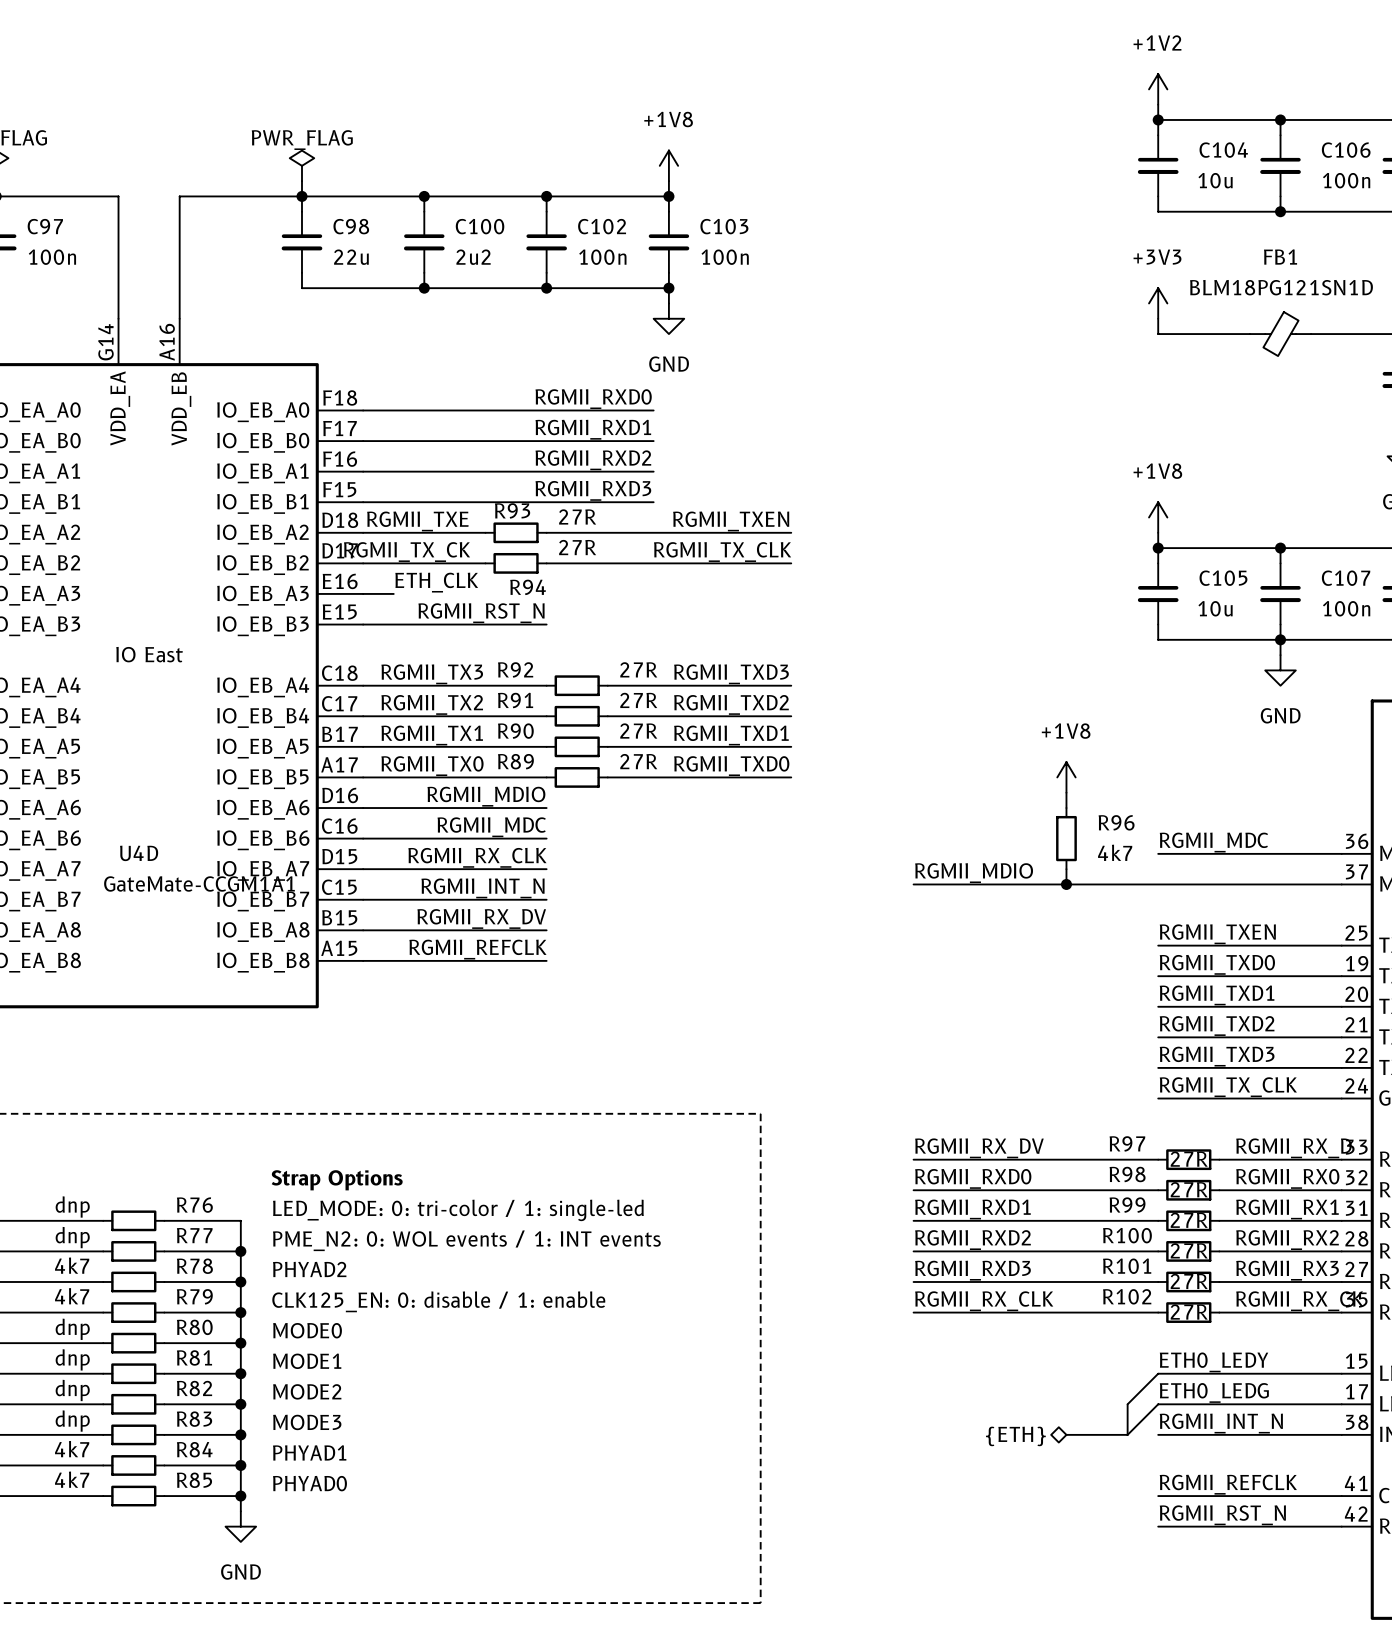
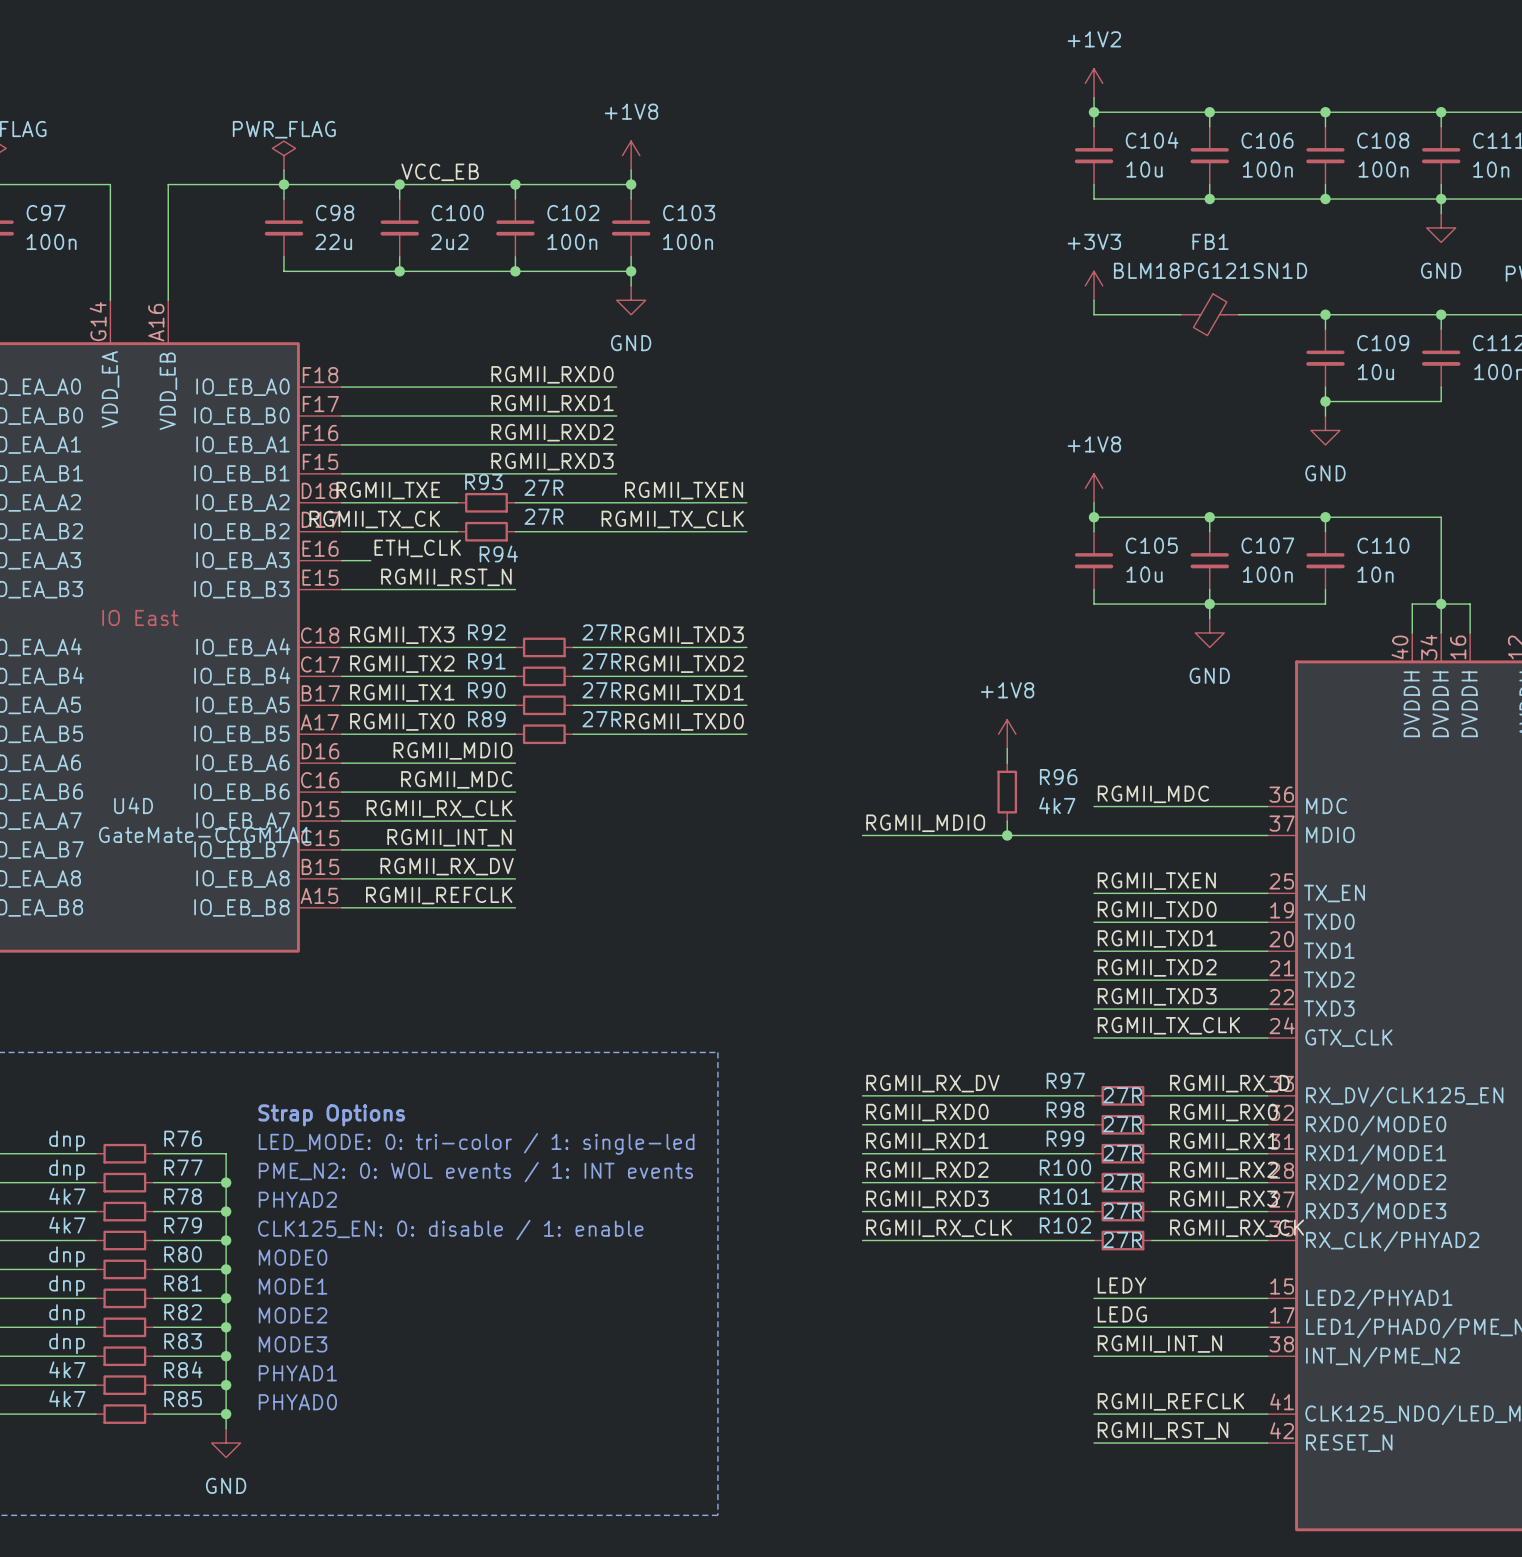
label: none -> VCC_EB (440, 172)
label: ETH0_LEDY (1214, 1362) -> LEDY (1122, 1285)
wire: (1158, 1373) (1127, 1404) -> none
label: ETH0_LEDG (1214, 1392) -> LEDG (1122, 1314)
bus: (1127, 1404) (1127, 1434) (1066, 1434) -> none
wire: (1158, 1404) (1127, 1434) -> none
hierarchical label: {ETH} (1015, 1436) -> none

